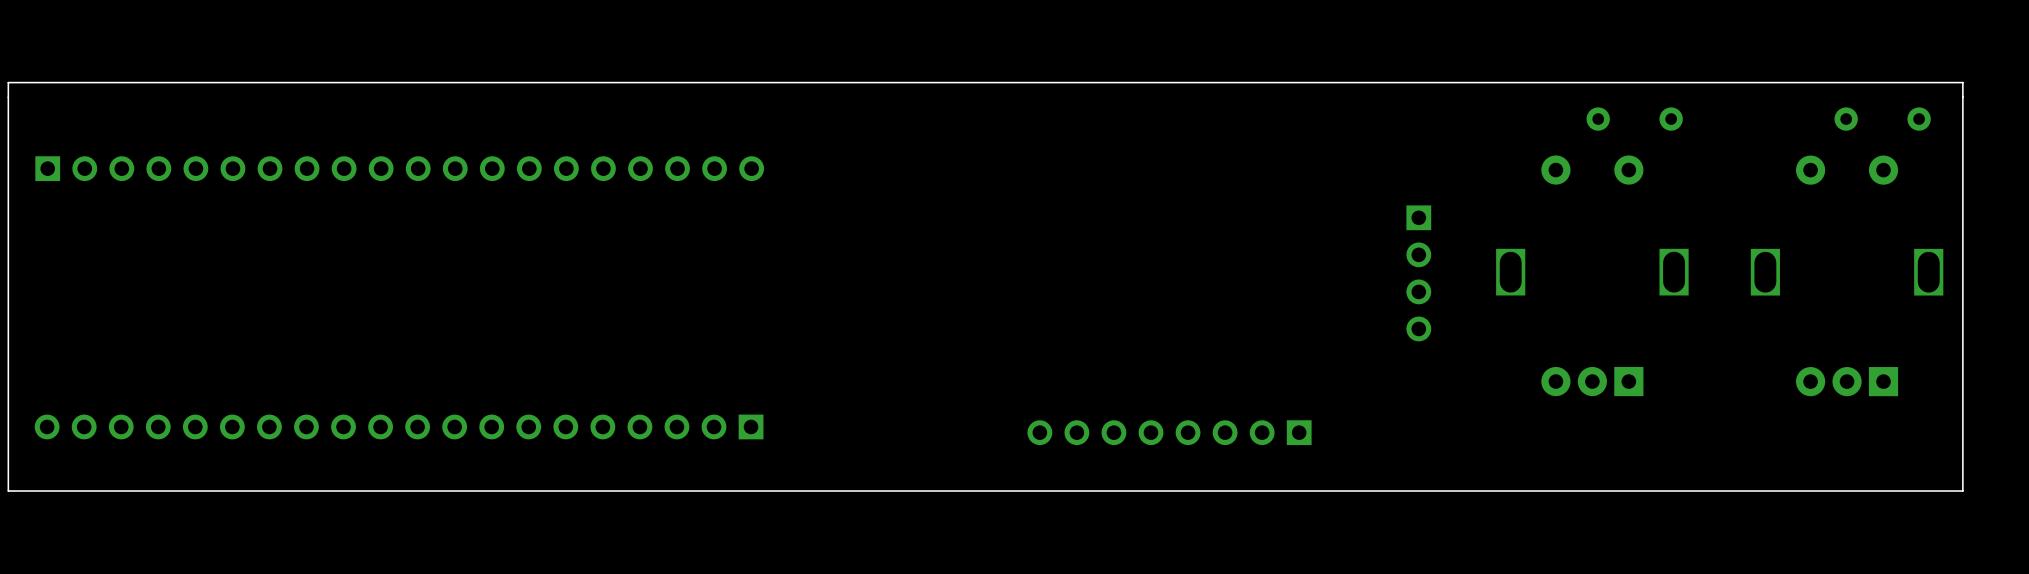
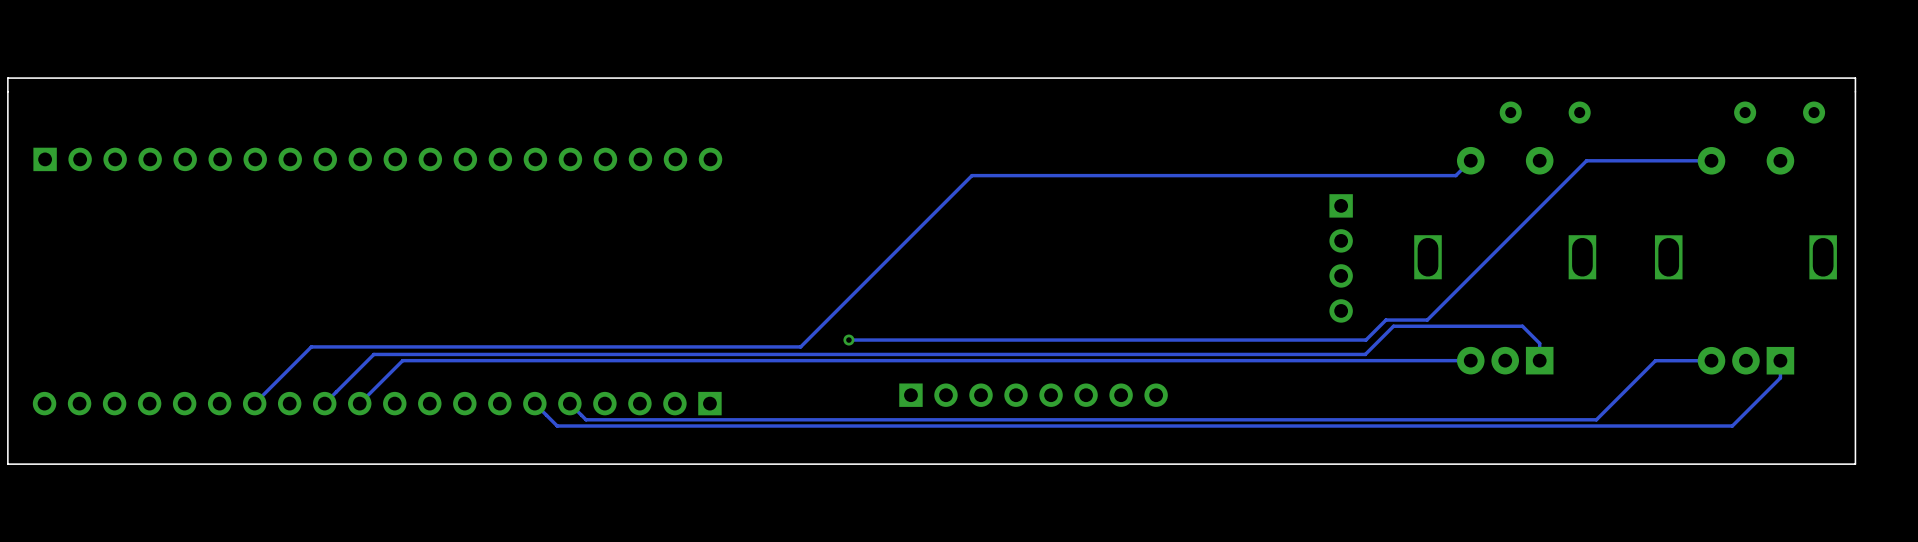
track: none -> (1470, 160) (1455, 175) (971, 175) (800, 346) (311, 346) (254, 403)
track: none -> (1711, 160) (1586, 160) (1427, 320) (1385, 320) (1365, 340) (848, 340)
via: none -> (848, 340)
track: none -> (1470, 360) (402, 360) (359, 403)
track: none -> (1539, 360) (1539, 343) (1522, 326) (1393, 326) (1365, 354) (373, 354) (324, 403)
track: none -> (1711, 360) (1655, 360) (1596, 419) (586, 419) (569, 403)
track: none -> (1780, 360) (1780, 377) (1732, 426) (557, 426) (534, 403)
part rotation: 0° (1169, 432) -> 180° (1033, 395)

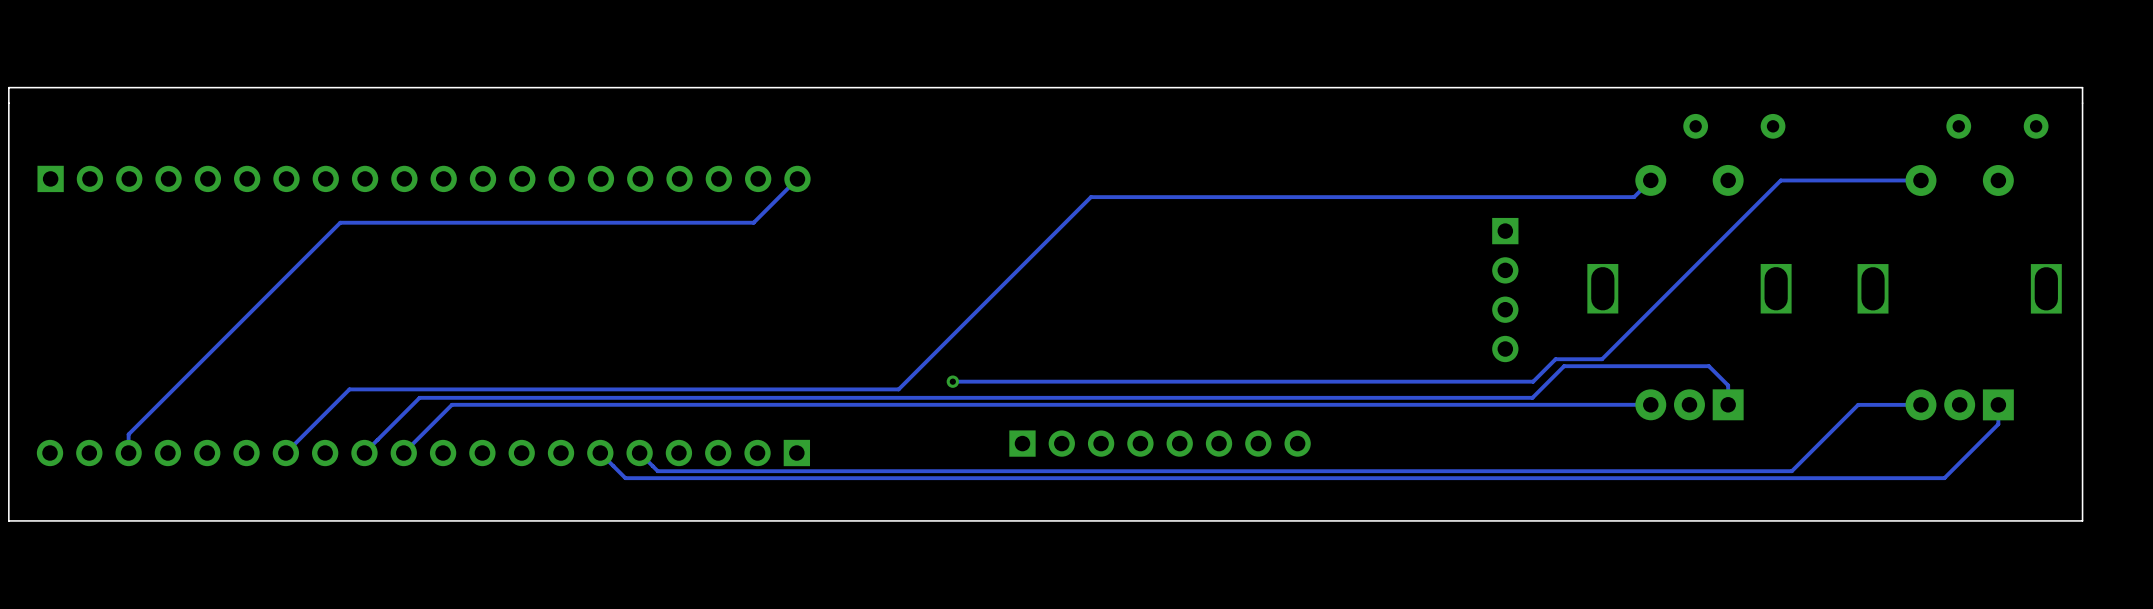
track: none -> (797, 178) (753, 222) (340, 222) (128, 434) (128, 453)

